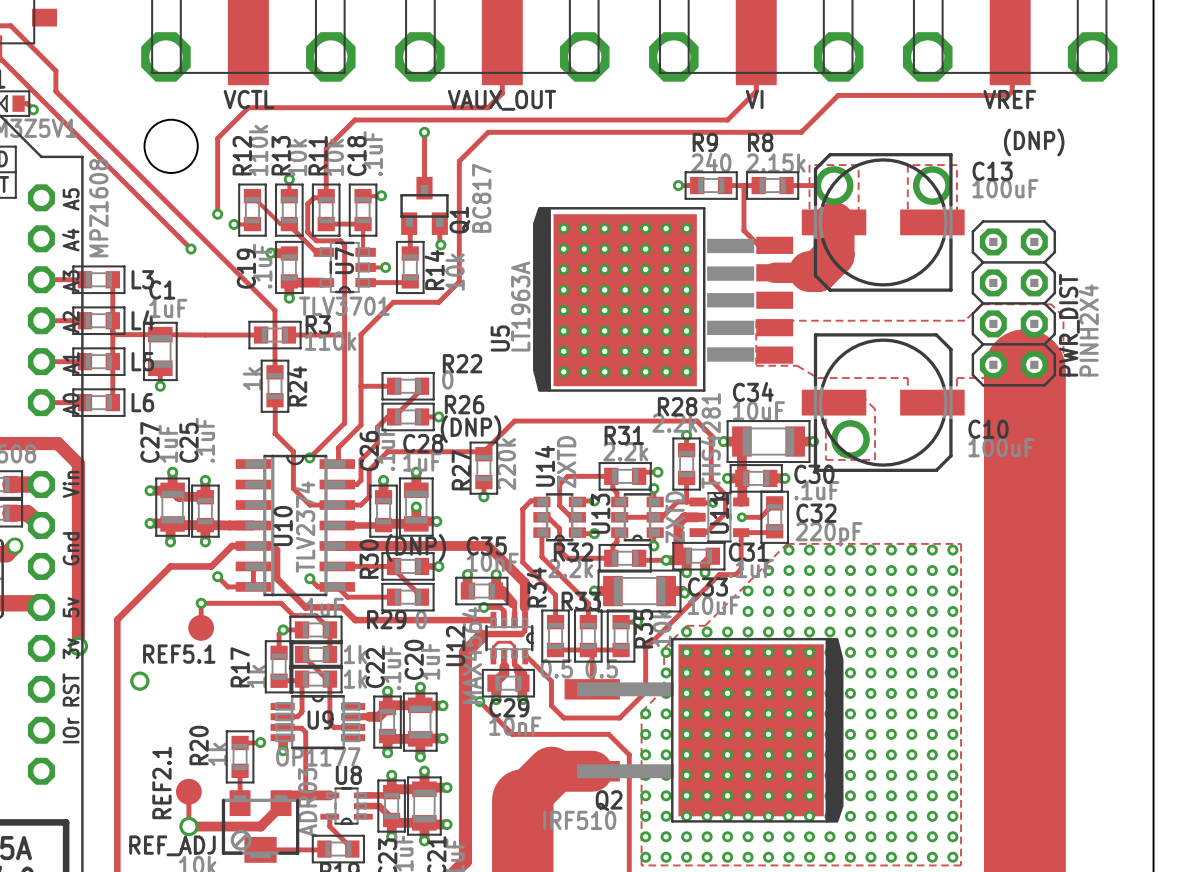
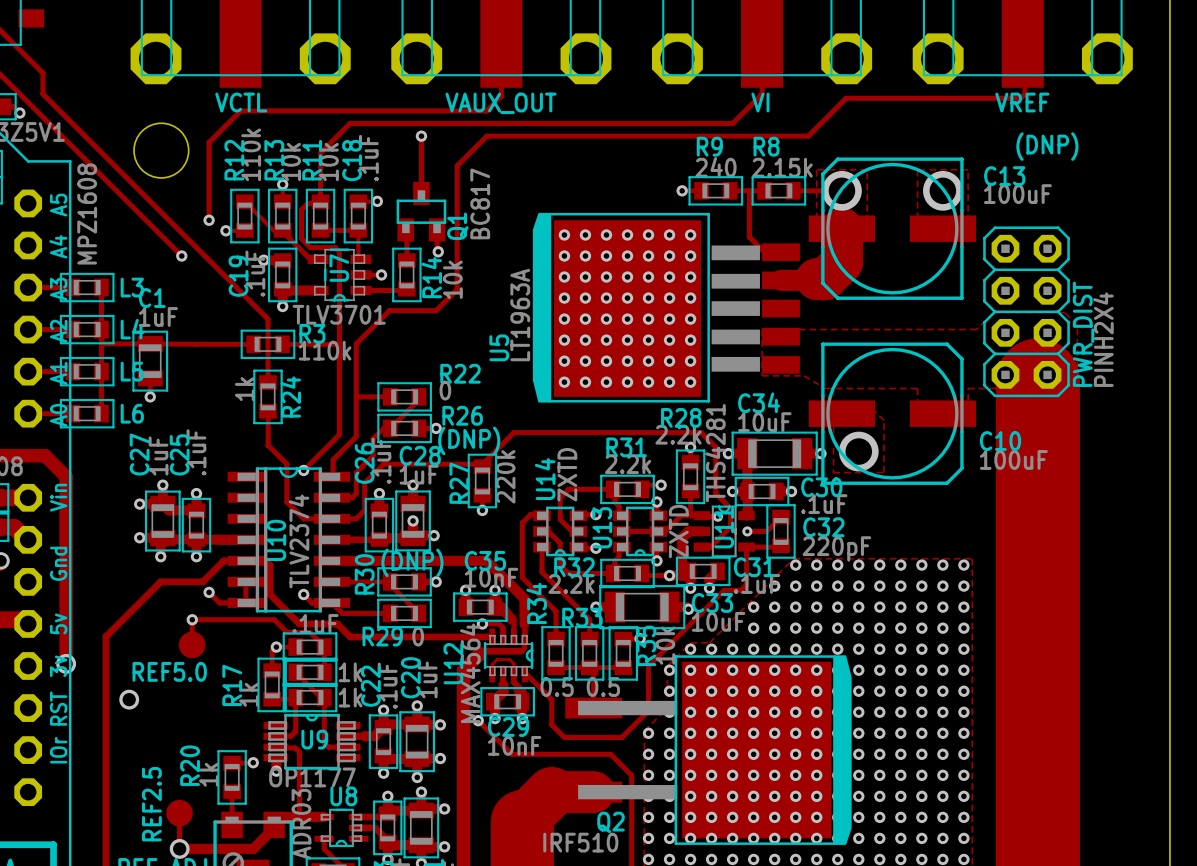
REF5.1 name: REF5.1 (179, 654) -> REF5.0 (169, 671)
REF2.1 name: REF2.1 (161, 782) -> REF2.5 (151, 804)

